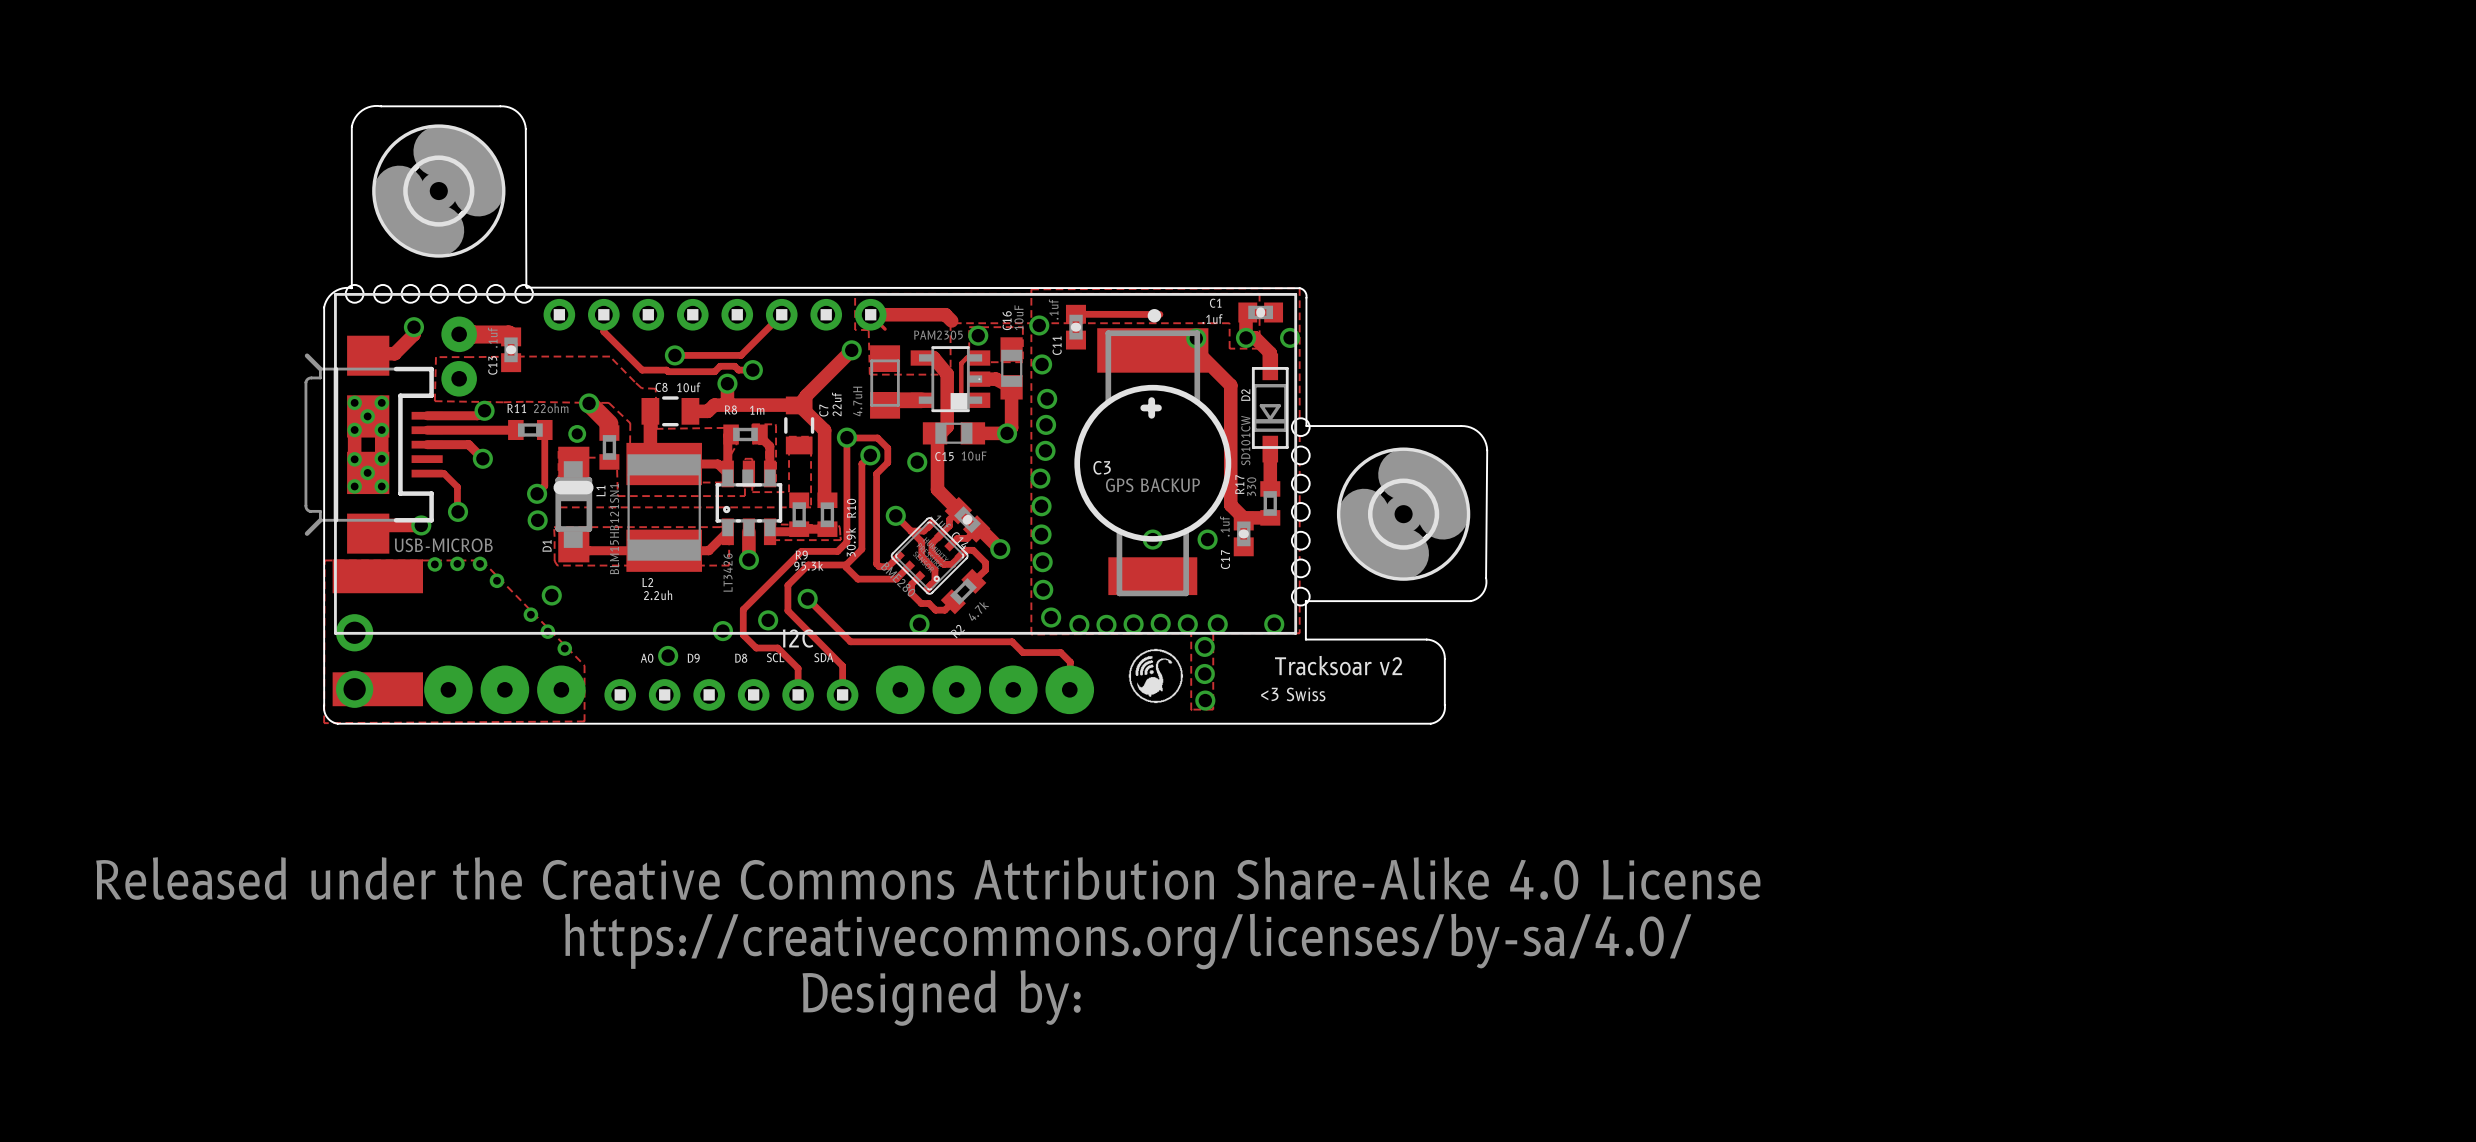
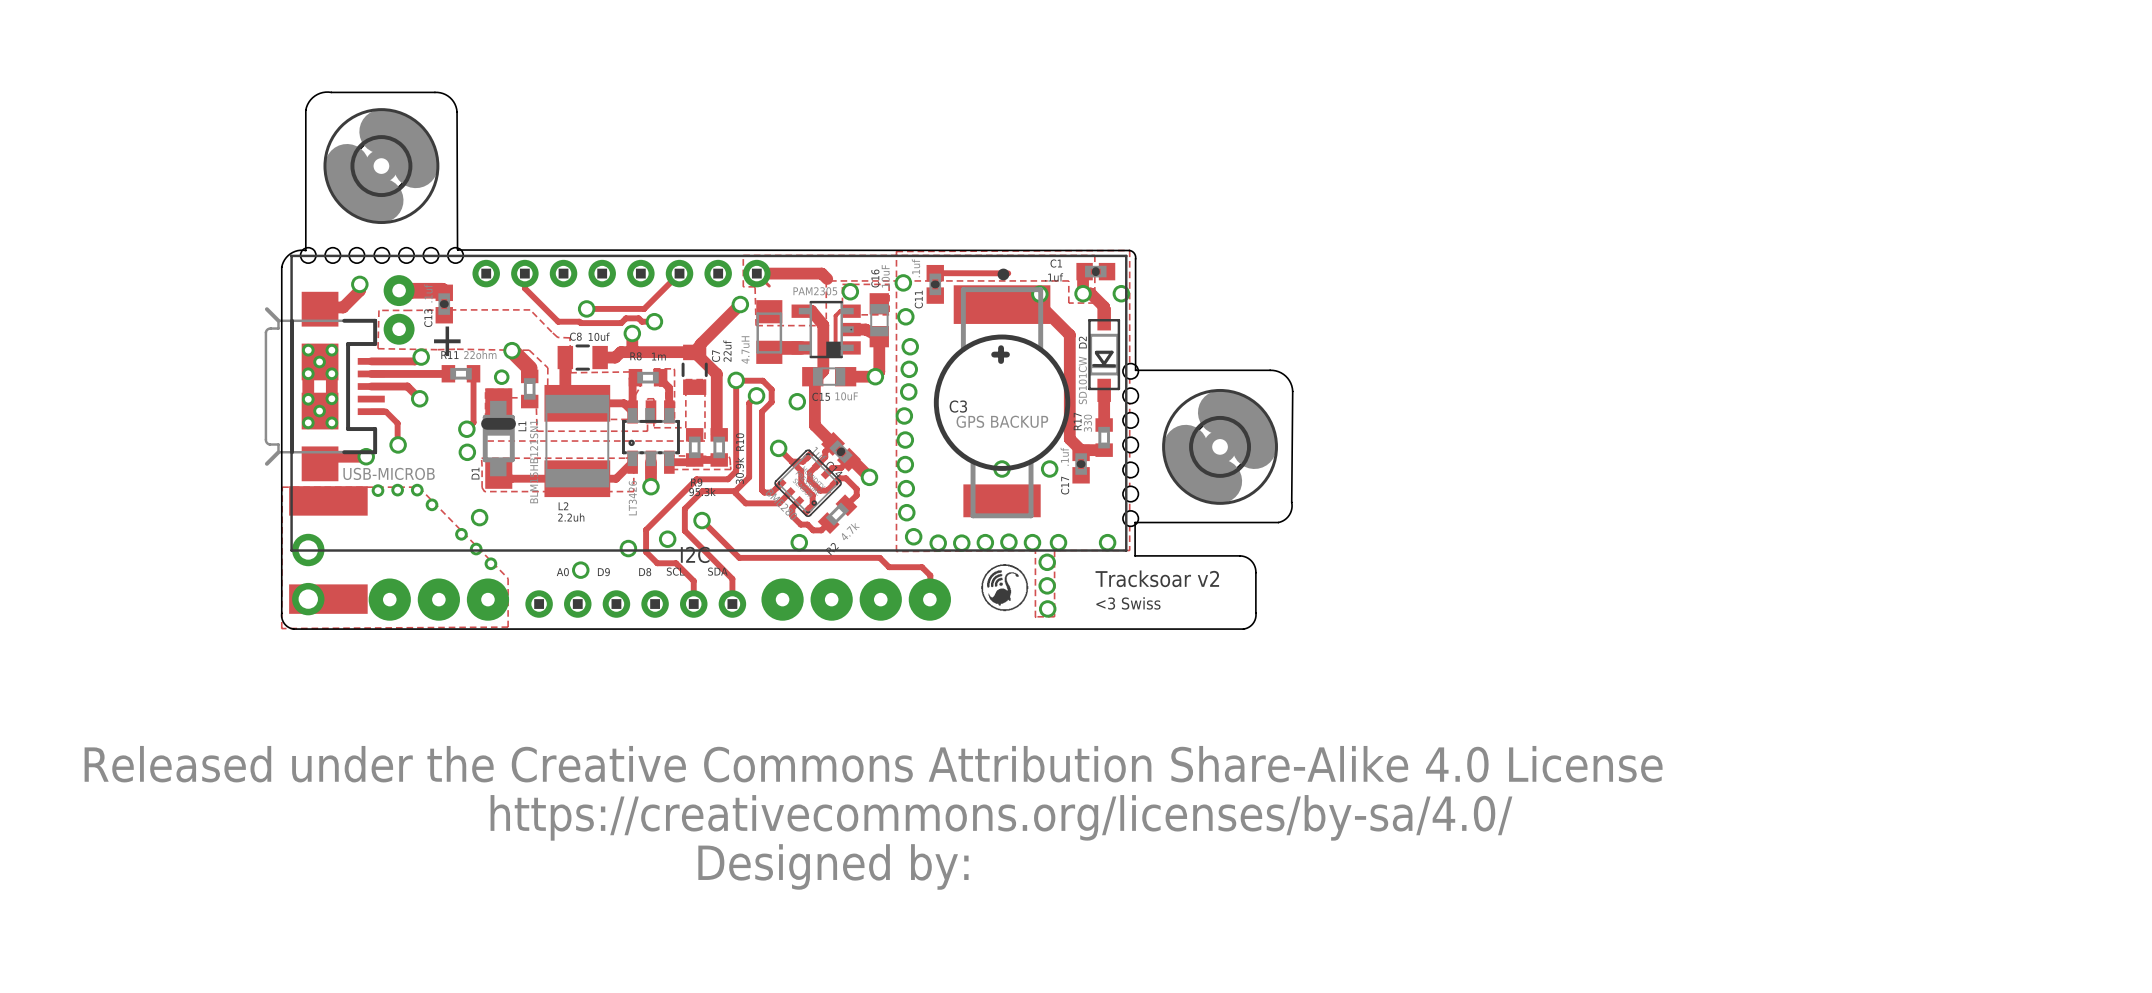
text: none -> + (447, 341)
line: none -> (1096, 352) (1112, 352) (1104, 363) (1096, 353)
line: none -> (1093, 365) (1114, 365)

